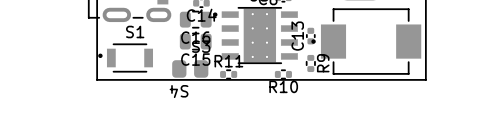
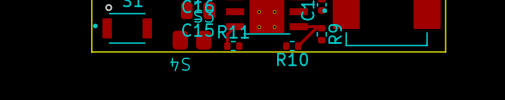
via: none -> (108, 7)
track: none -> (235, 26) (227, 34) (227, 45)
track: none -> (298, 26) (321, 28) (316, 28) (298, 46)

